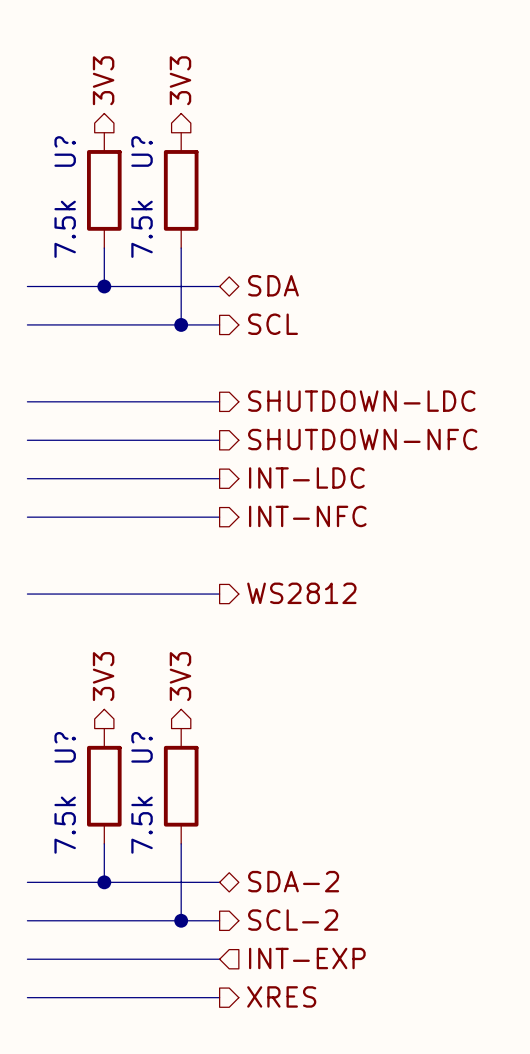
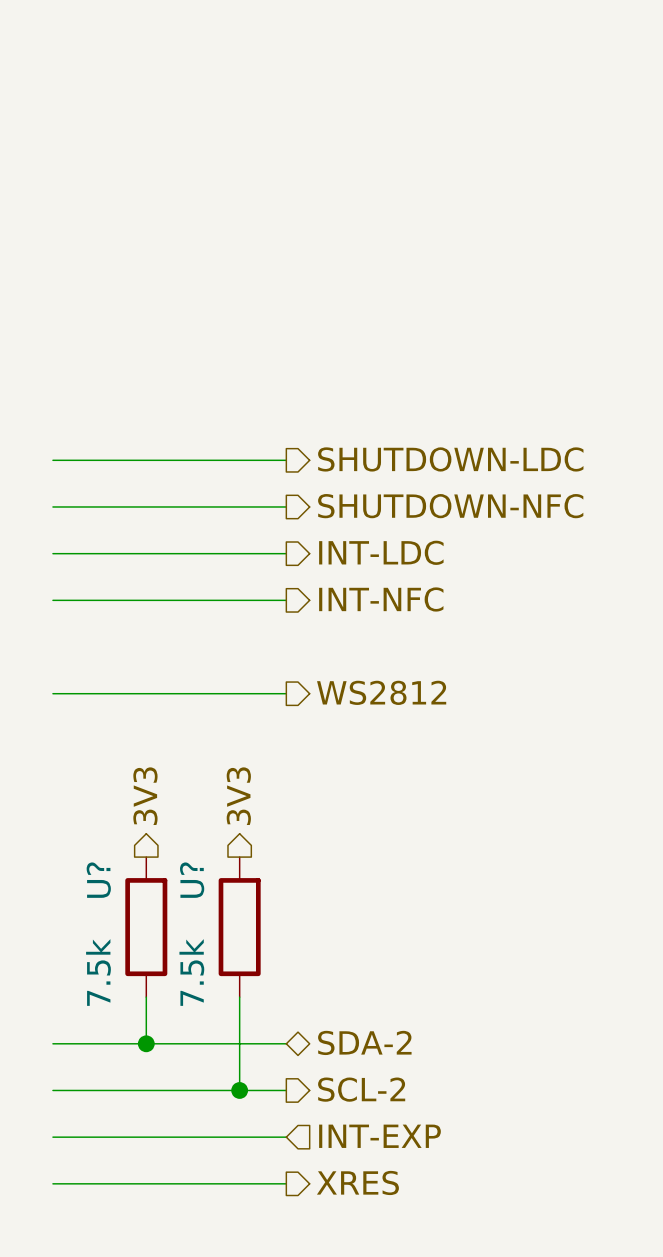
hierarchical label: 3V3 (103, 80) -> none
hierarchical label: 3V3 (180, 80) -> none
U?: 7.5k (104, 190) -> none
U?: 7.5k (181, 190) -> none
wire: (104, 248) (104, 286) -> none
wire: (181, 248) (181, 324) -> none
hierarchical label: SDA (273, 285) -> none
wire: (27, 286) (219, 286) -> none
junction: (104, 286) -> none
wire: (27, 324) (219, 324) -> none
junction: (181, 324) -> none
hierarchical label: SCL (273, 324) -> none

